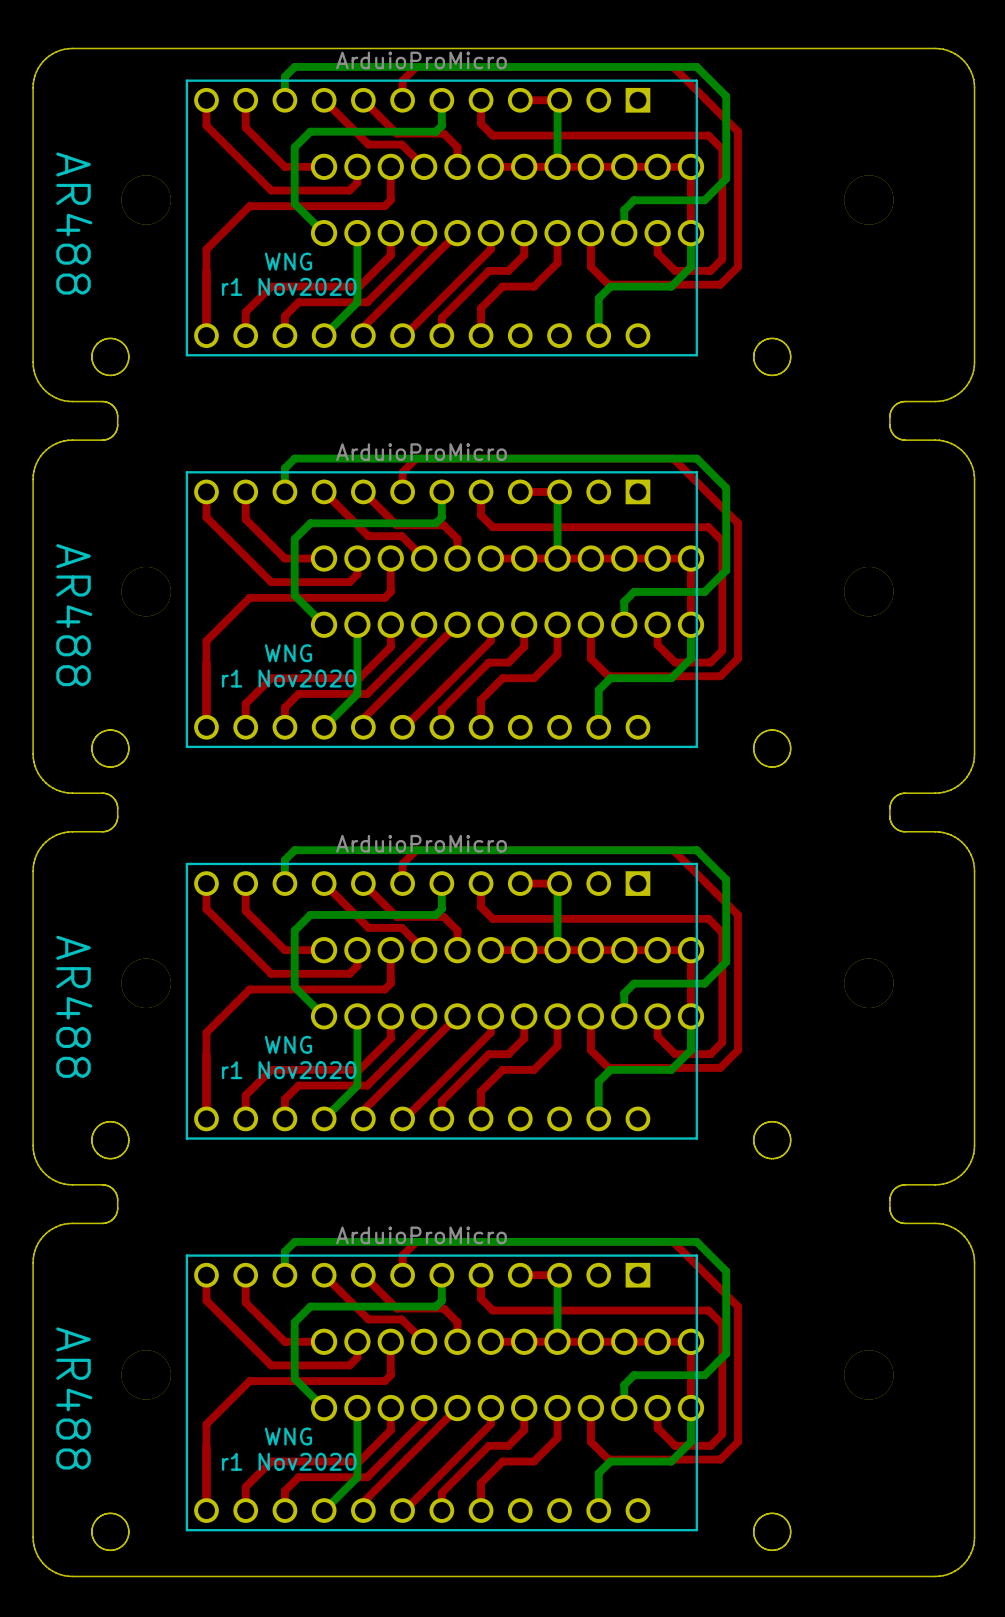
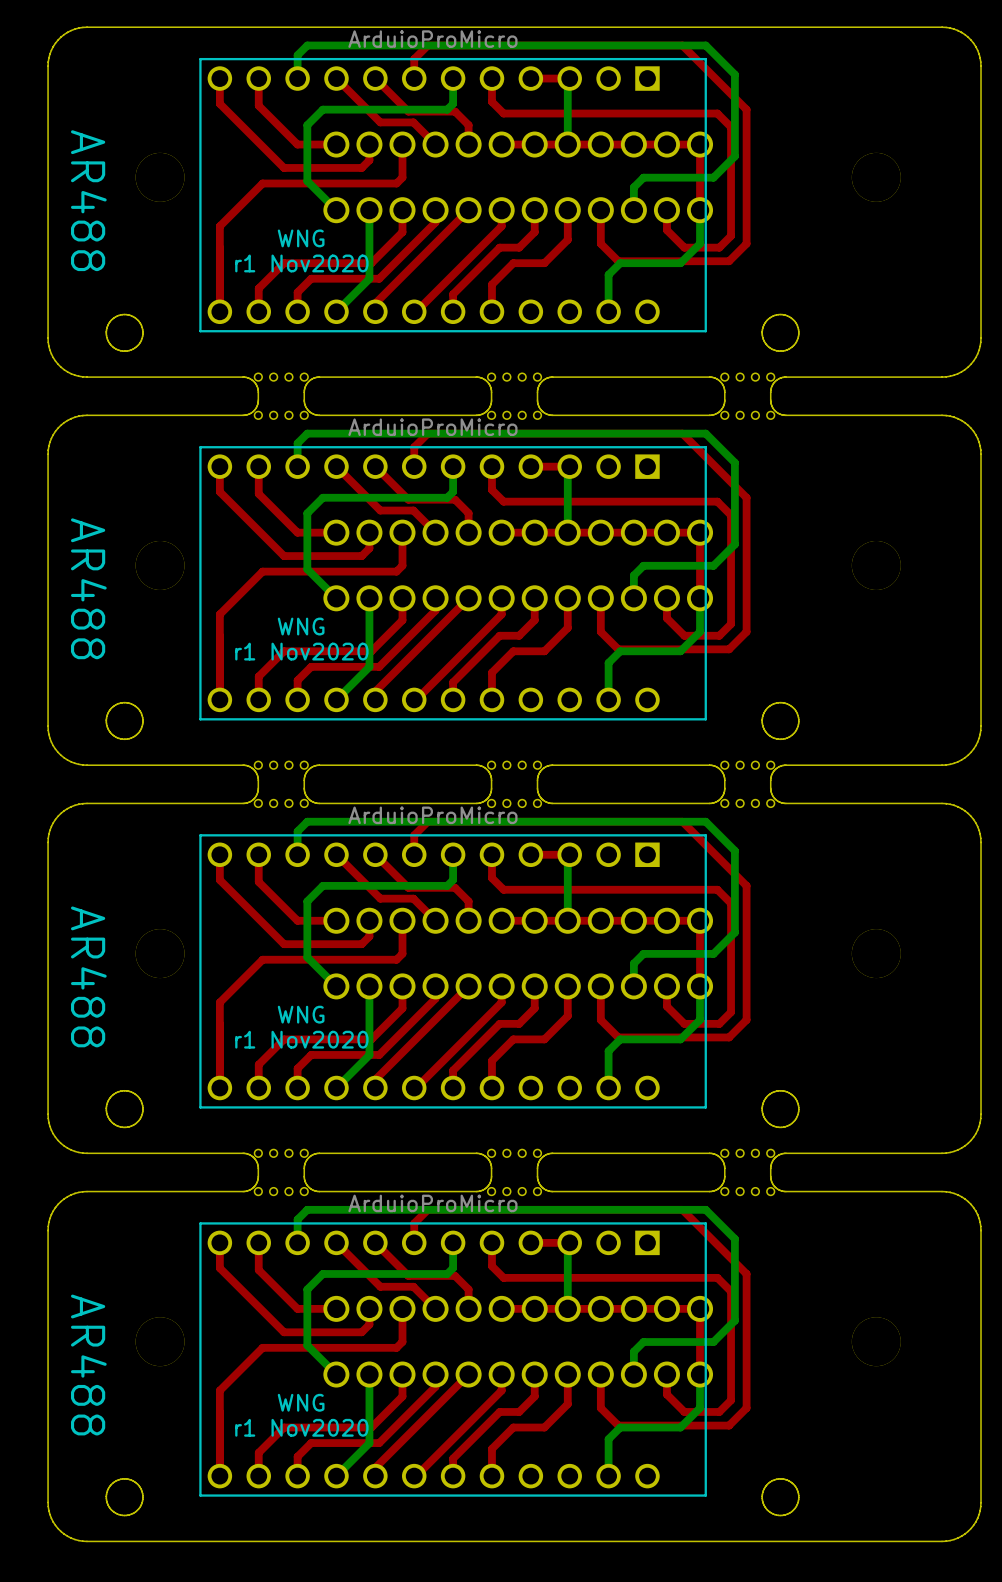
board edge: (102, 401) (113, 406) (117, 416) (115, 433) (109, 438) (102, 440) -> (116, 377) (244, 377) (254, 382) (258, 392) (256, 407) (246, 415) (116, 415)
part: none -> (258, 377)
part: none -> (273, 377)
part: none -> (288, 377)
part: none -> (304, 377)
board edge: none -> (476, 377) (317, 377) (311, 379) (306, 385) (304, 401) (308, 410) (317, 415) (477, 415) (484, 412) (489, 407) (491, 392) (487, 381) (476, 377)
part: none -> (491, 377)
part: none -> (506, 377)
part: none -> (522, 377)
part: none -> (537, 377)
board edge: none -> (709, 377) (551, 377) (544, 379) (539, 385) (537, 401) (541, 410) (551, 415) (711, 415) (718, 412) (723, 407) (724, 392) (720, 381) (709, 377)
part: none -> (724, 377)
part: none -> (740, 377)
part: none -> (755, 377)
part: none -> (770, 377)
board edge: (905, 401) (894, 406) (889, 416) (892, 433) (897, 438) (905, 440) -> (912, 377) (784, 377) (774, 382) (770, 392) (772, 407) (782, 415) (912, 415)
part: none -> (258, 415)
part: none -> (273, 415)
part: none -> (288, 415)
part: none -> (304, 415)
part: none -> (491, 415)
part: none -> (506, 415)
part: none -> (522, 415)
part: none -> (537, 415)
part: none -> (724, 415)
part: none -> (740, 415)
part: none -> (755, 415)
part: none -> (770, 415)
board edge: (102, 793) (113, 797) (117, 808) (115, 824) (109, 829) (102, 831) -> (116, 765) (244, 765) (254, 770) (258, 780) (256, 795) (246, 803) (116, 803)
part: none -> (258, 765)
part: none -> (273, 765)
part: none -> (288, 765)
part: none -> (304, 765)
board edge: none -> (476, 765) (317, 765) (311, 767) (306, 773) (304, 789) (308, 799) (317, 803) (477, 803) (484, 800) (489, 795) (491, 780) (487, 769) (476, 765)
part: none -> (491, 765)
part: none -> (506, 765)
part: none -> (522, 765)
part: none -> (537, 765)
board edge: none -> (709, 765) (551, 765) (544, 767) (539, 773) (537, 789) (541, 799) (551, 803) (711, 803) (718, 800) (723, 795) (724, 780) (720, 769) (709, 765)
part: none -> (724, 765)
part: none -> (740, 765)
part: none -> (755, 765)
part: none -> (770, 765)
board edge: (905, 793) (894, 797) (889, 808) (892, 824) (897, 829) (905, 831) -> (912, 765) (784, 765) (774, 770) (770, 780) (772, 795) (782, 803) (912, 803)
part: none -> (258, 803)
part: none -> (273, 803)
part: none -> (288, 803)
part: none -> (304, 803)
part: none -> (491, 803)
part: none -> (506, 803)
part: none -> (522, 803)
part: none -> (537, 803)
part: none -> (724, 803)
part: none -> (740, 803)
part: none -> (755, 803)
part: none -> (770, 803)
board edge: (102, 1184) (113, 1189) (117, 1200) (115, 1216) (109, 1221) (102, 1223) -> (116, 1153) (244, 1153) (254, 1158) (258, 1168) (256, 1183) (246, 1191) (116, 1191)
part: none -> (258, 1153)
part: none -> (273, 1153)
part: none -> (288, 1153)
part: none -> (304, 1153)
board edge: none -> (476, 1153) (317, 1153) (311, 1155) (306, 1161) (304, 1177) (308, 1187) (317, 1191) (477, 1191) (484, 1189) (489, 1183) (491, 1168) (487, 1157) (476, 1153)
part: none -> (491, 1153)
part: none -> (506, 1153)
part: none -> (522, 1153)
part: none -> (537, 1153)
board edge: none -> (709, 1153) (551, 1153) (544, 1155) (539, 1161) (537, 1177) (541, 1187) (551, 1191) (711, 1191) (718, 1189) (723, 1183) (724, 1168) (720, 1157) (709, 1153)
part: none -> (724, 1153)
part: none -> (740, 1153)
part: none -> (755, 1153)
part: none -> (770, 1153)
board edge: (905, 1184) (894, 1189) (889, 1200) (892, 1216) (897, 1221) (905, 1223) -> (912, 1153) (784, 1153) (774, 1158) (770, 1168) (772, 1183) (782, 1191) (912, 1191)
part: none -> (258, 1191)
part: none -> (273, 1191)
part: none -> (288, 1191)
part: none -> (304, 1191)
part: none -> (491, 1191)
part: none -> (506, 1191)
part: none -> (522, 1191)
part: none -> (537, 1191)
part: none -> (724, 1191)
part: none -> (740, 1191)
part: none -> (755, 1191)
part: none -> (770, 1191)

